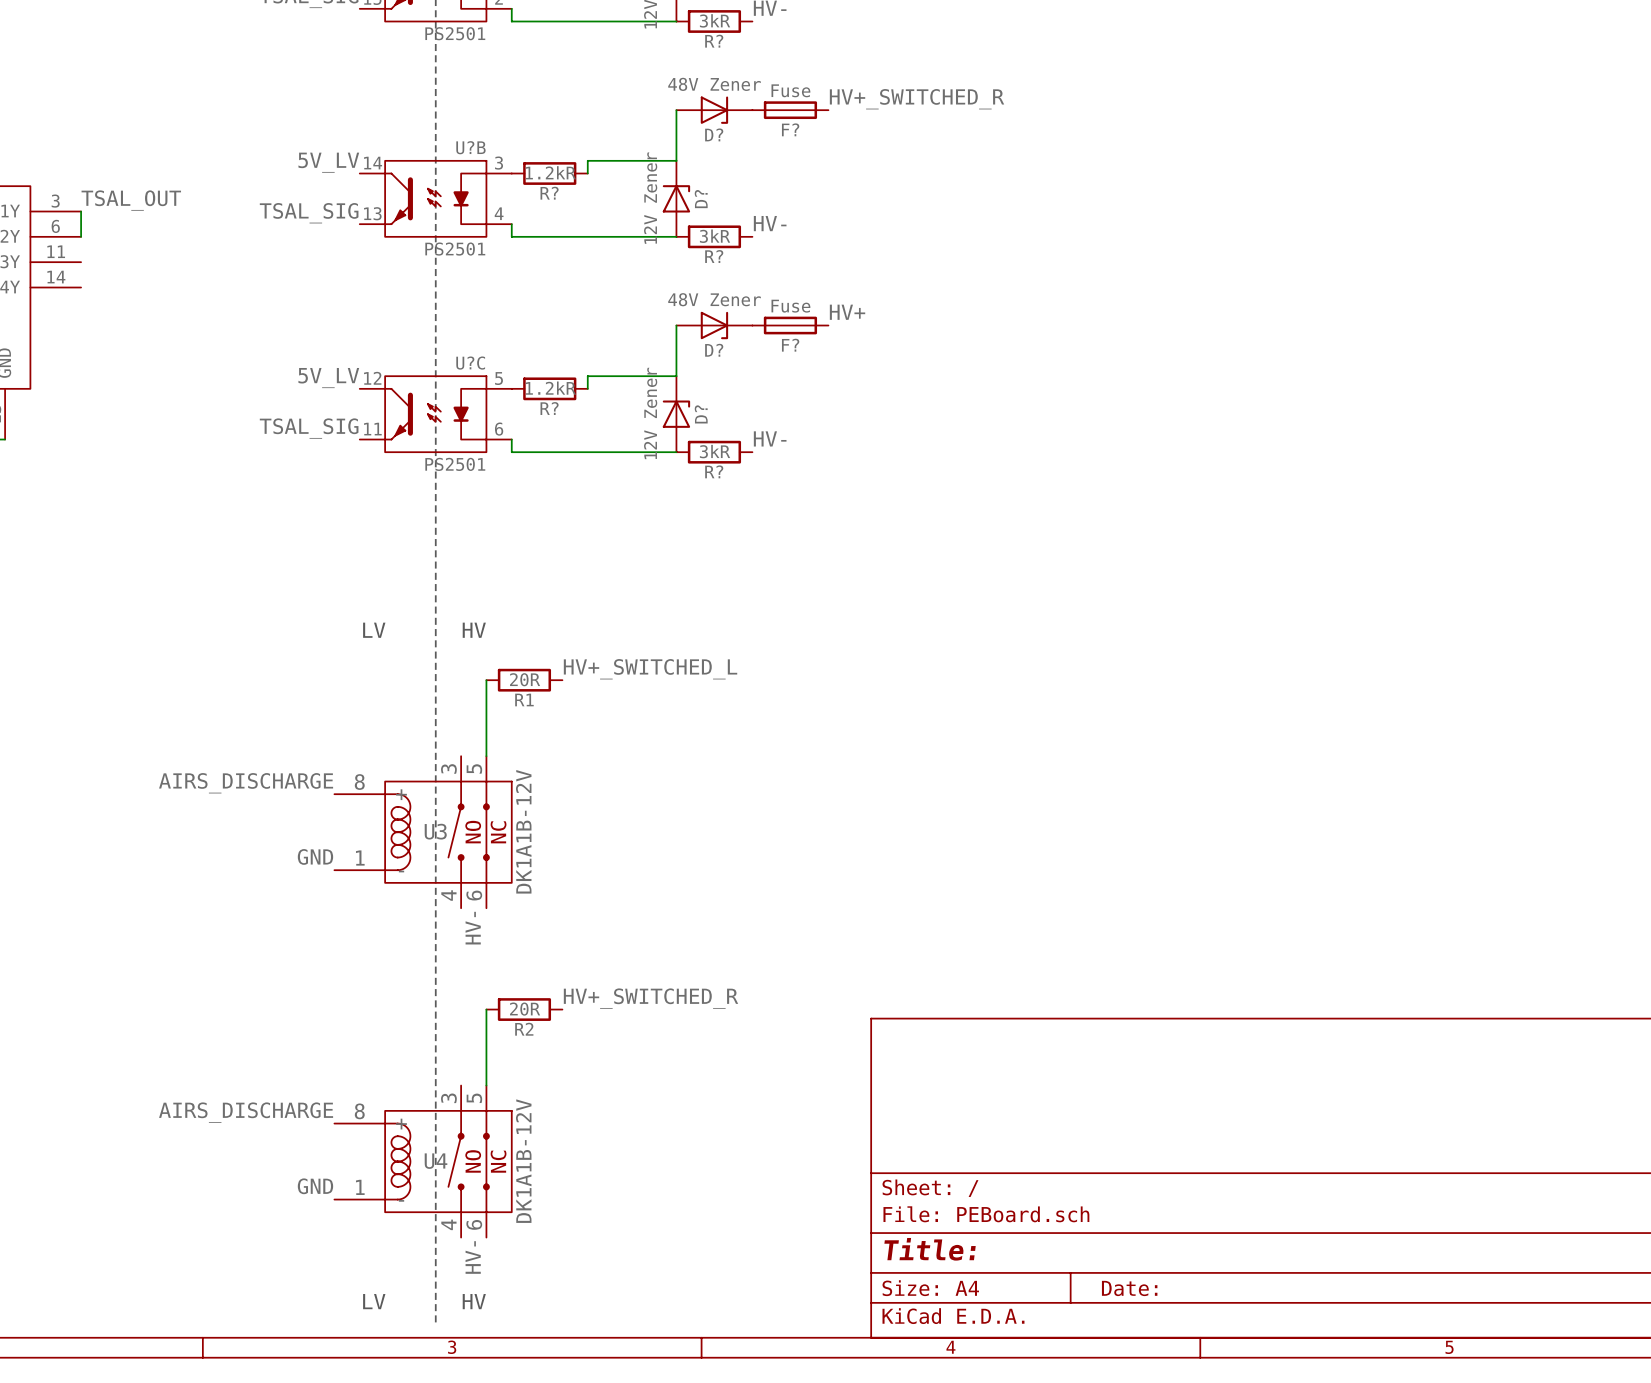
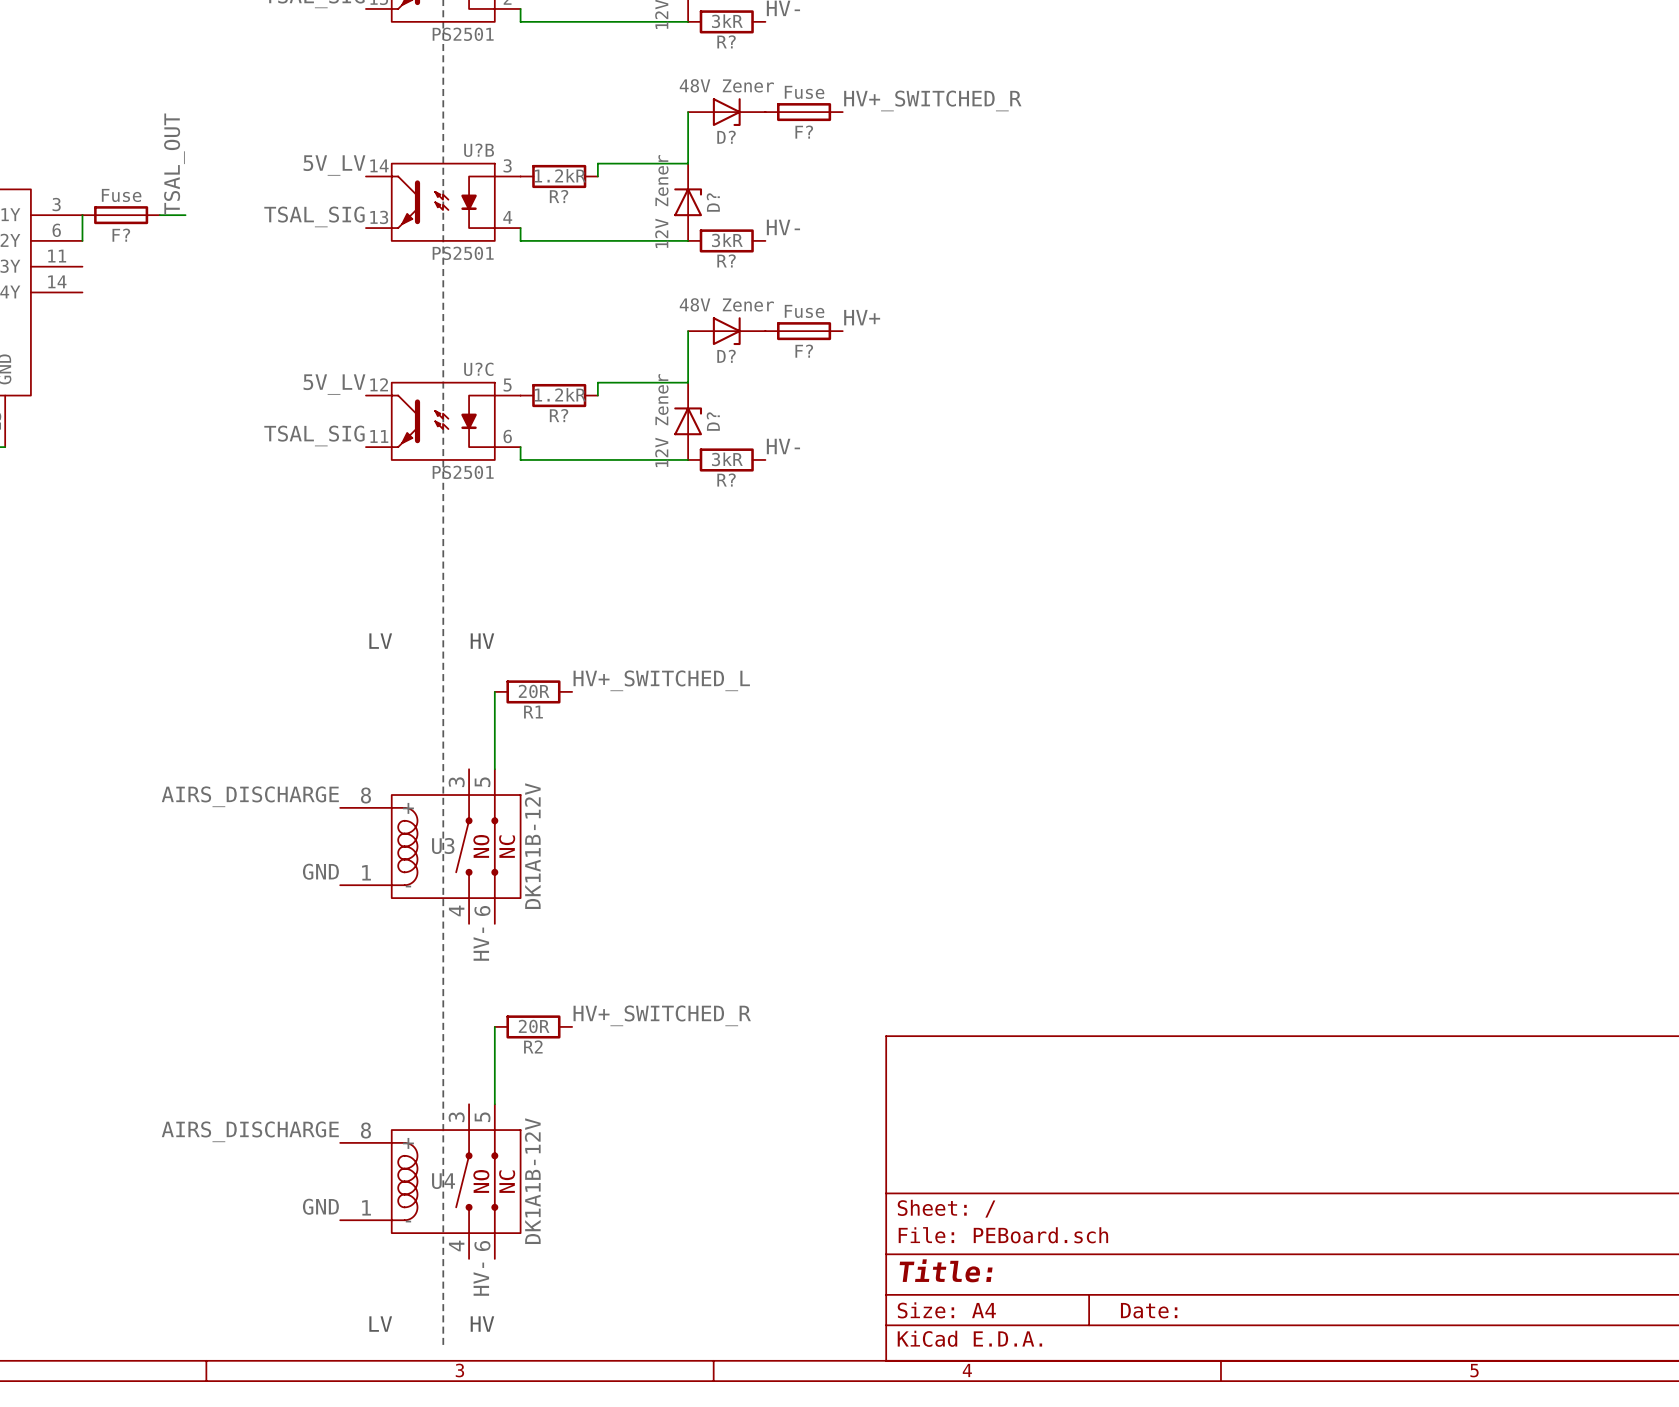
label rotation: 0° (131, 200) -> 90° counterclockwise (174, 164)
F?: none -> Fuse (121, 215)
wire: none -> (159, 215) (185, 215)

